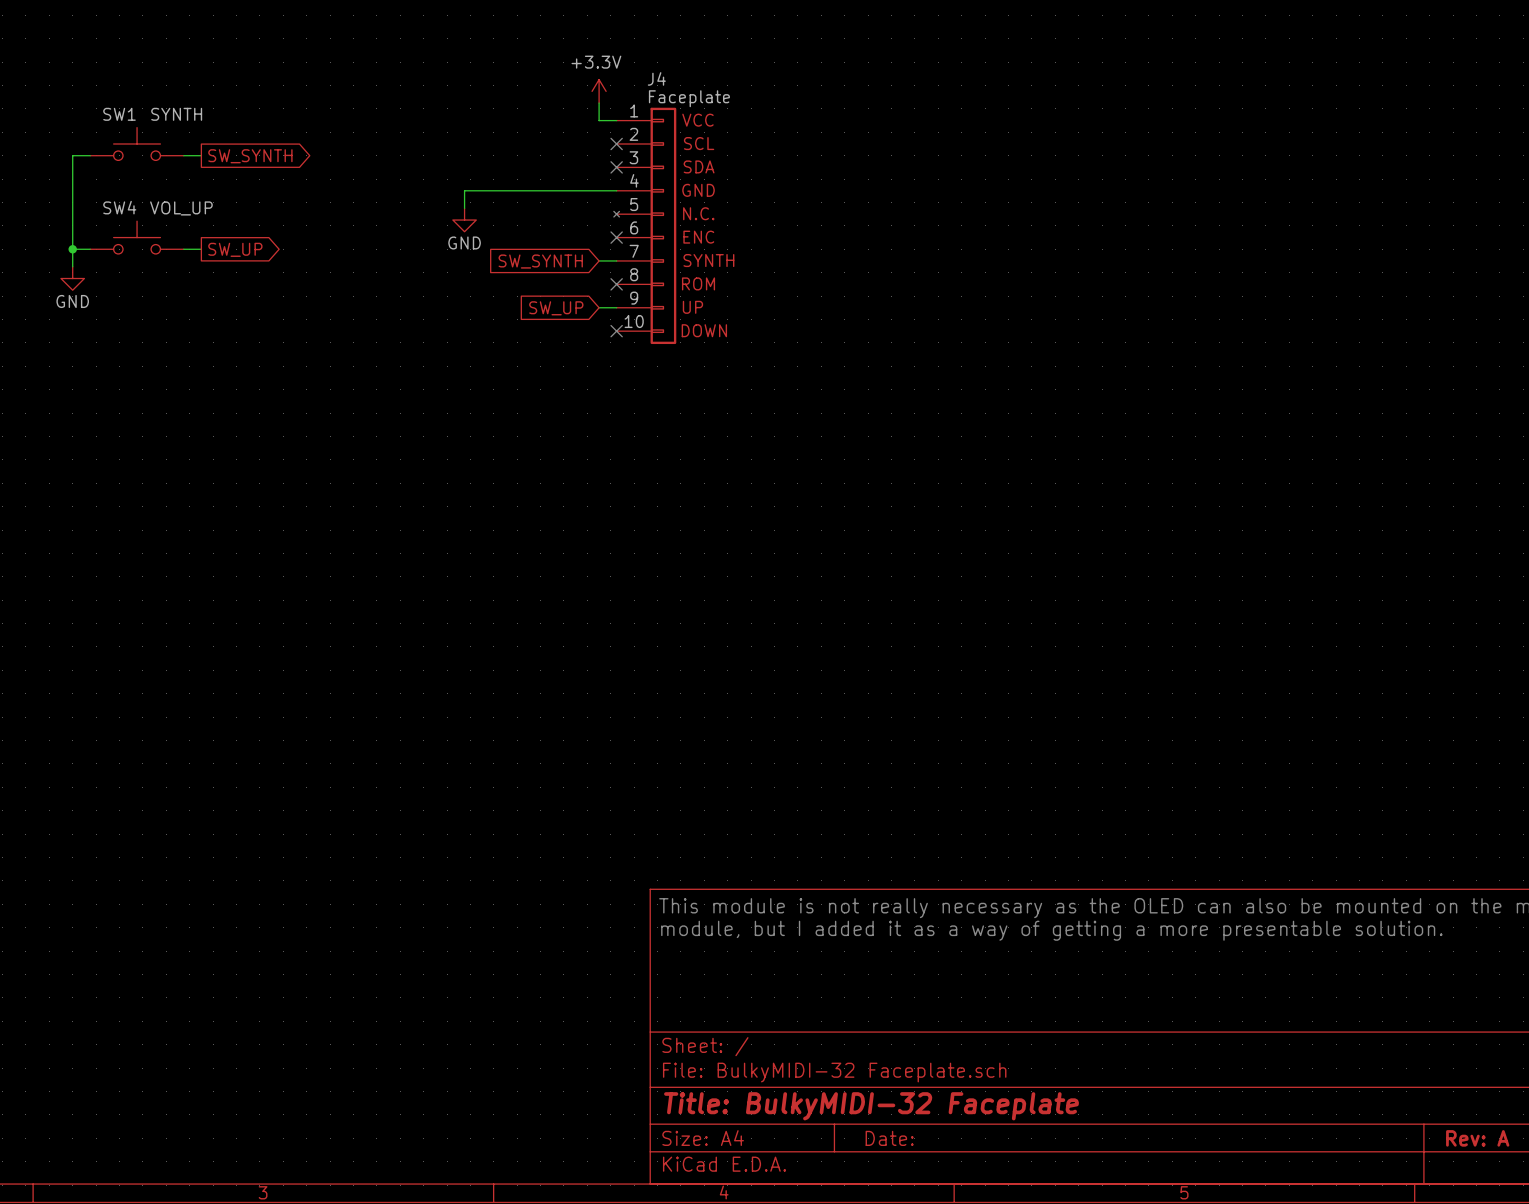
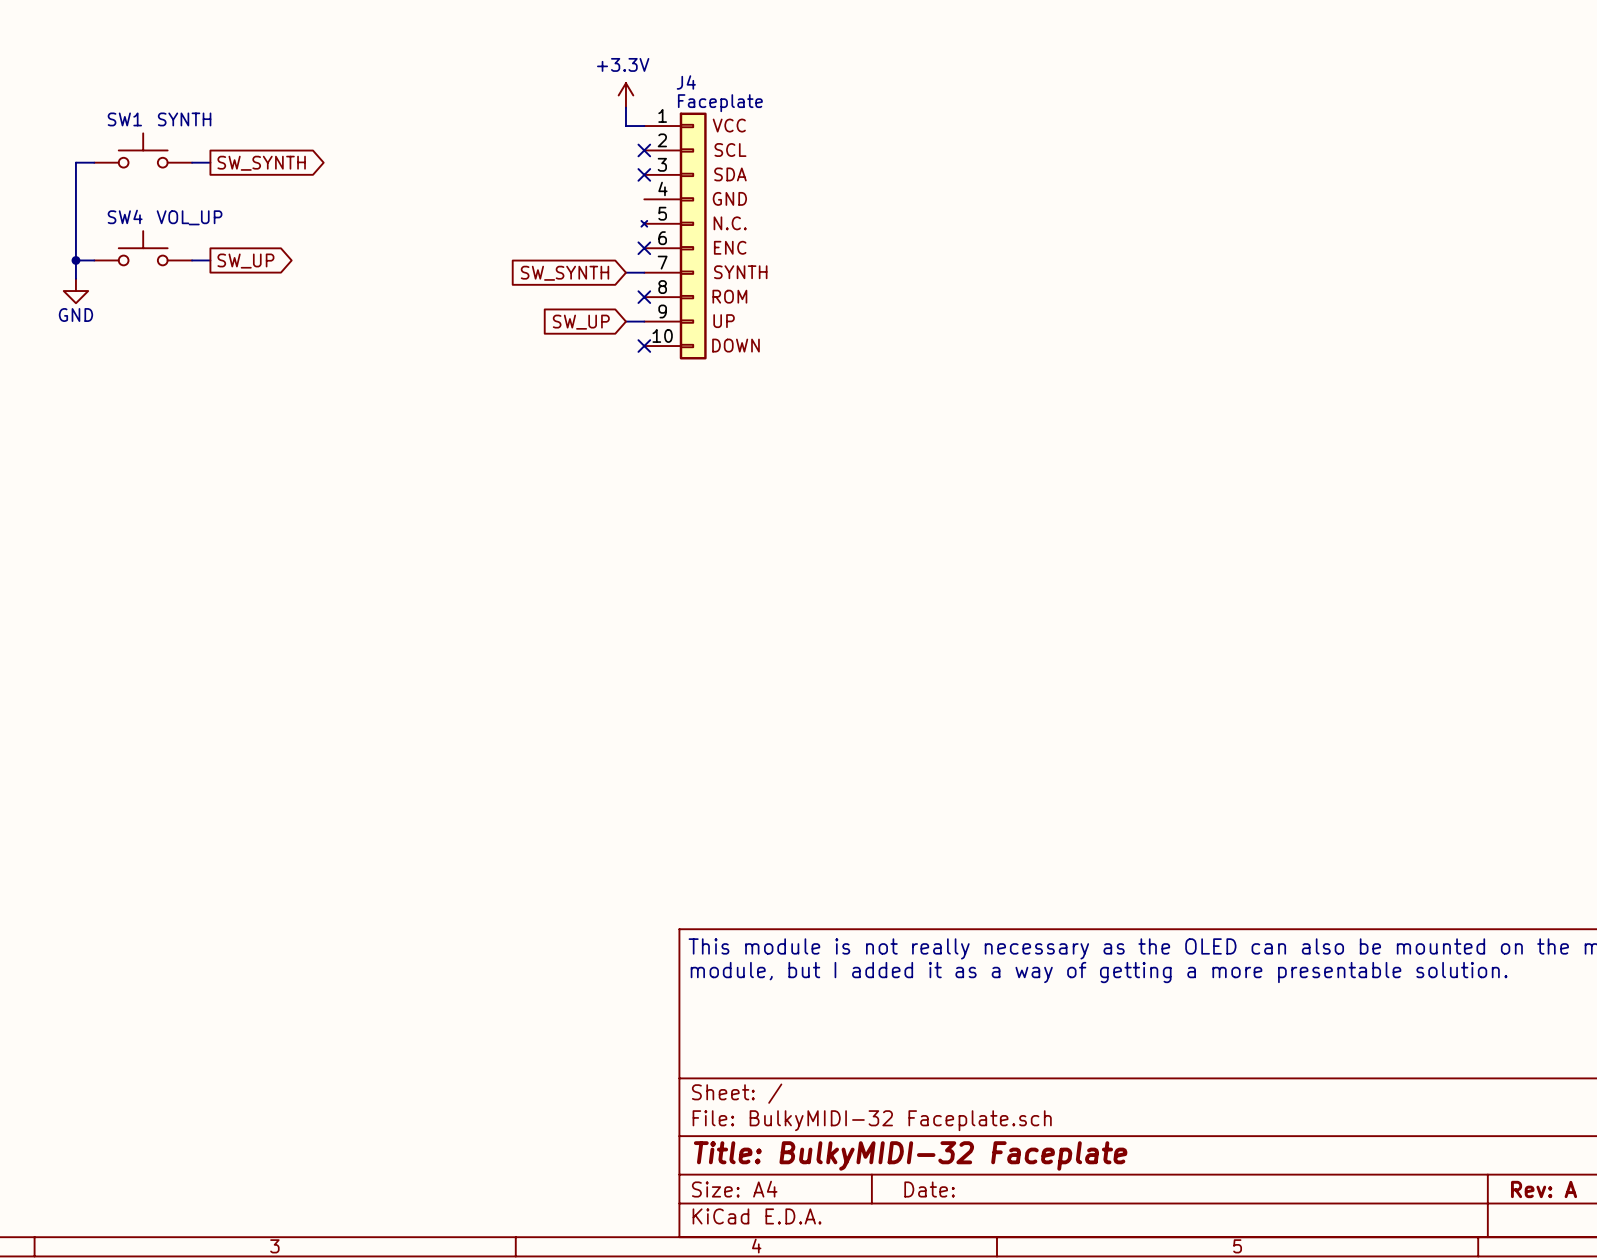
wire: (616, 190) (464, 190) (464, 208) -> none
power symbol: GND (464, 220) -> none

